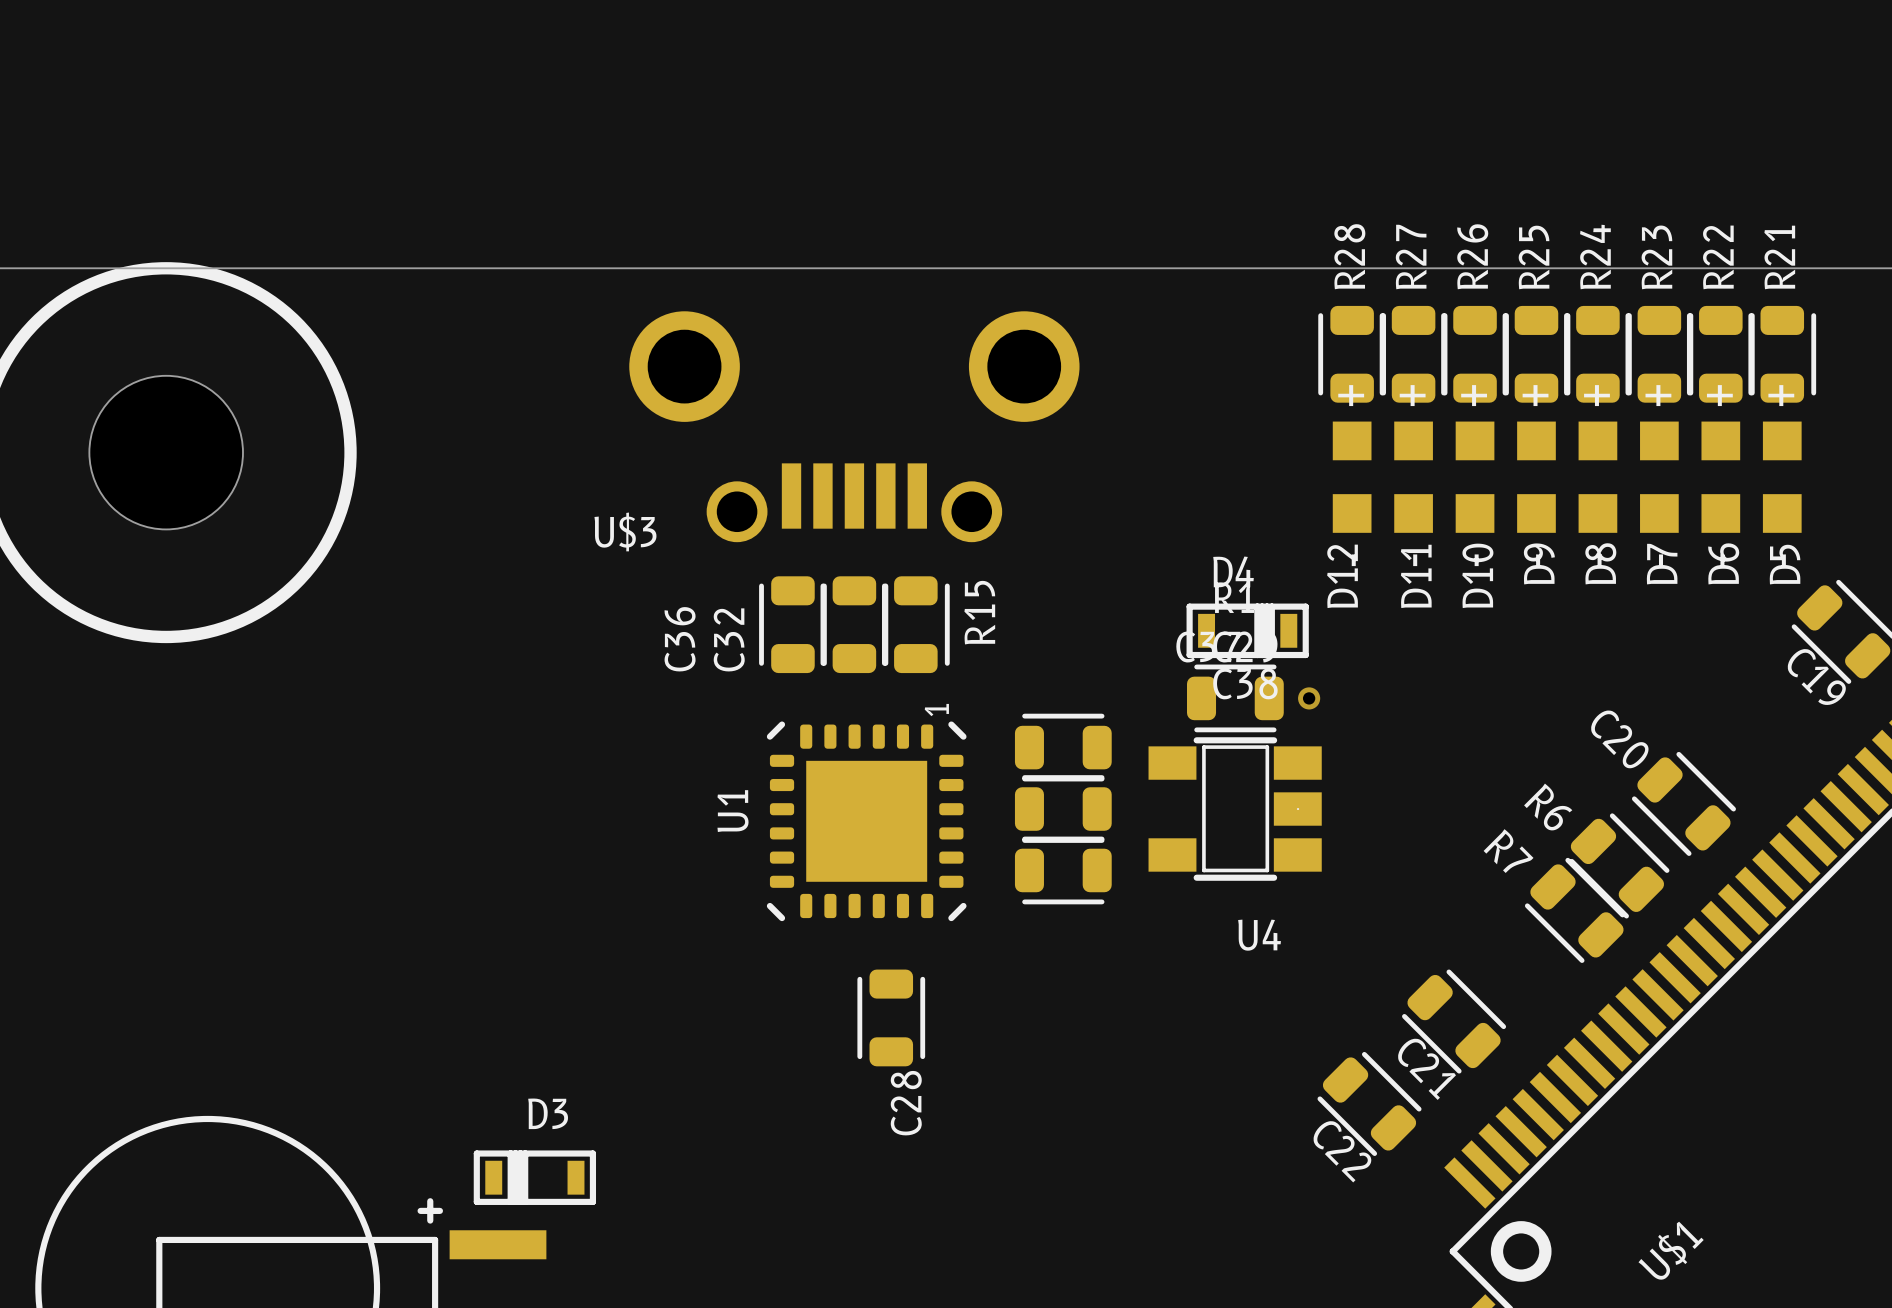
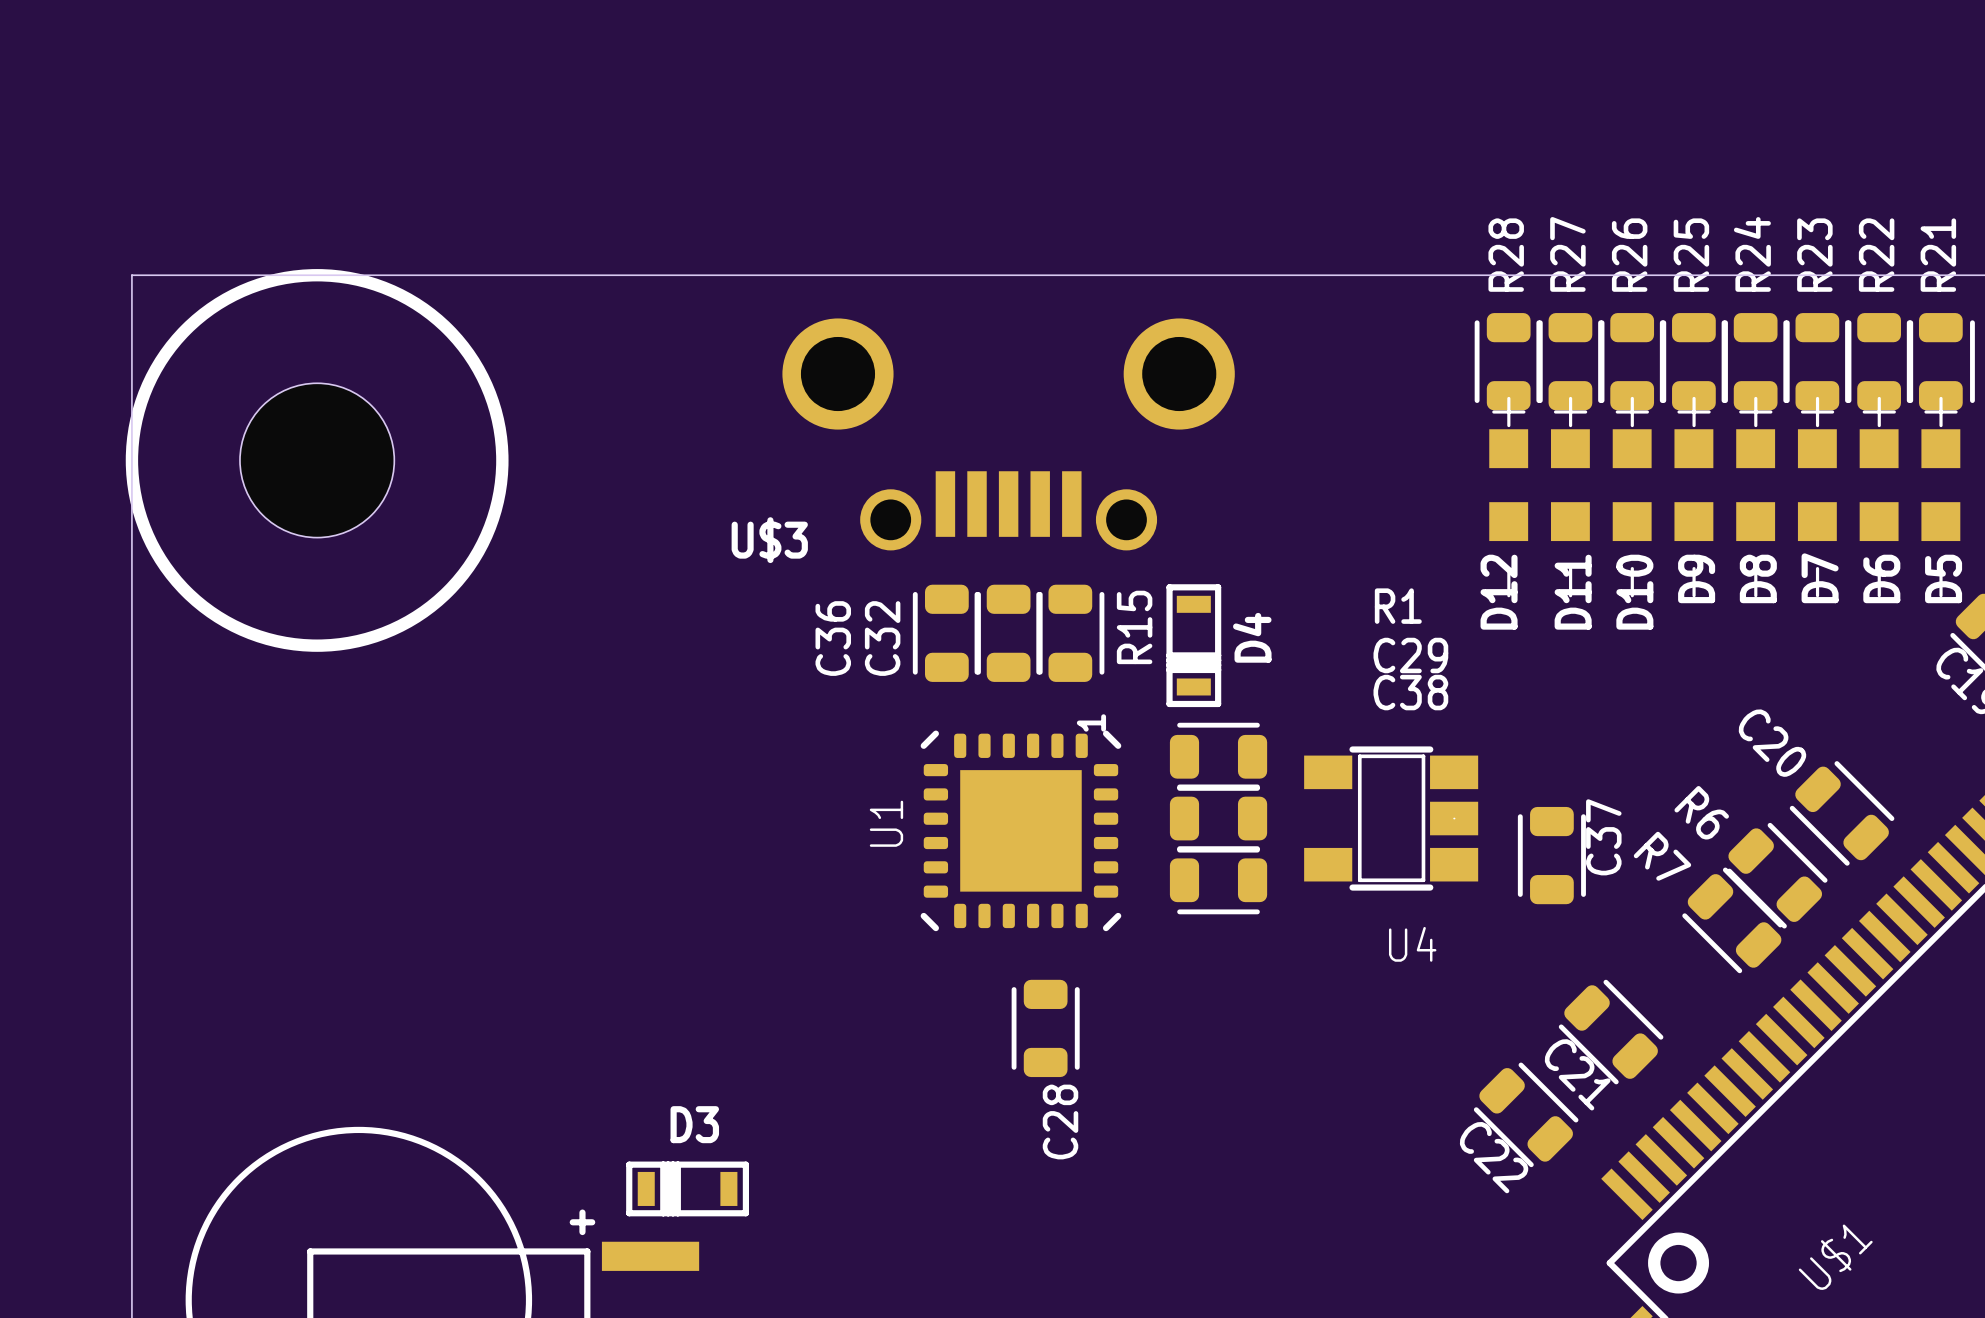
D4 rotation: 0° (1247, 630) -> 90° clockwise (1193, 645)
D4 position: (1247, 630) -> (1193, 645)
C37 rotation: 0° (1235, 698) -> 90° clockwise (1551, 855)
C37 position: (1235, 698) -> (1551, 855)
via: (1309, 698) -> none

